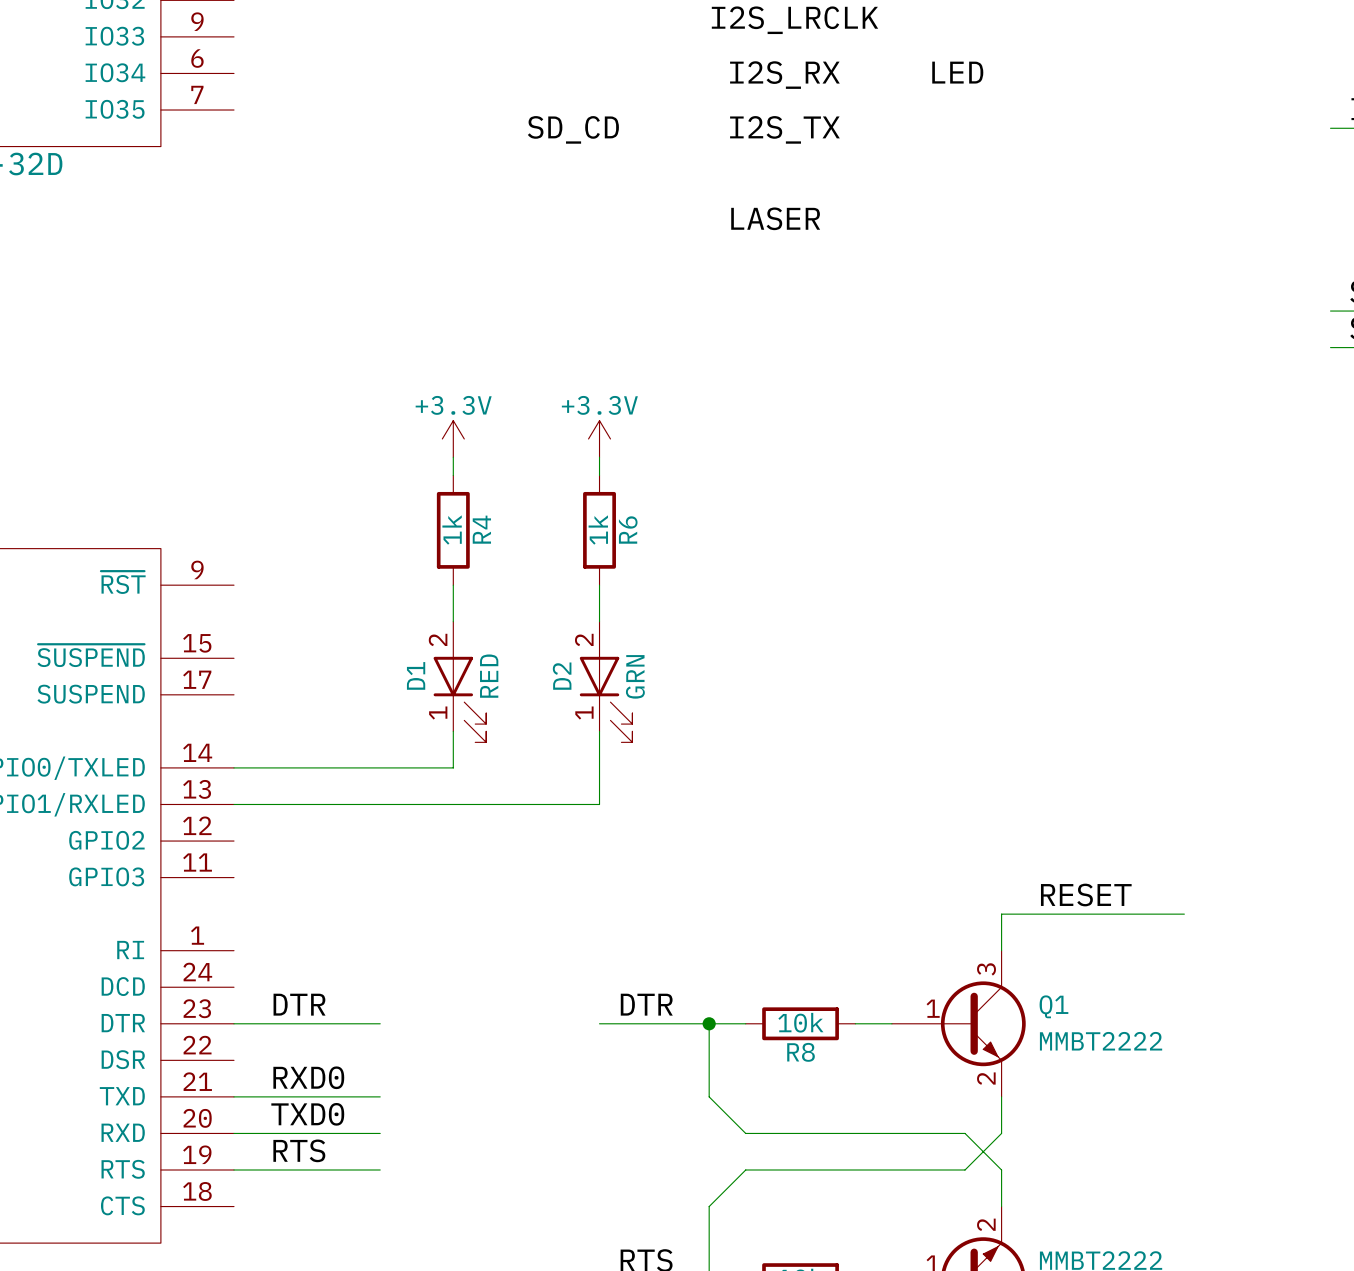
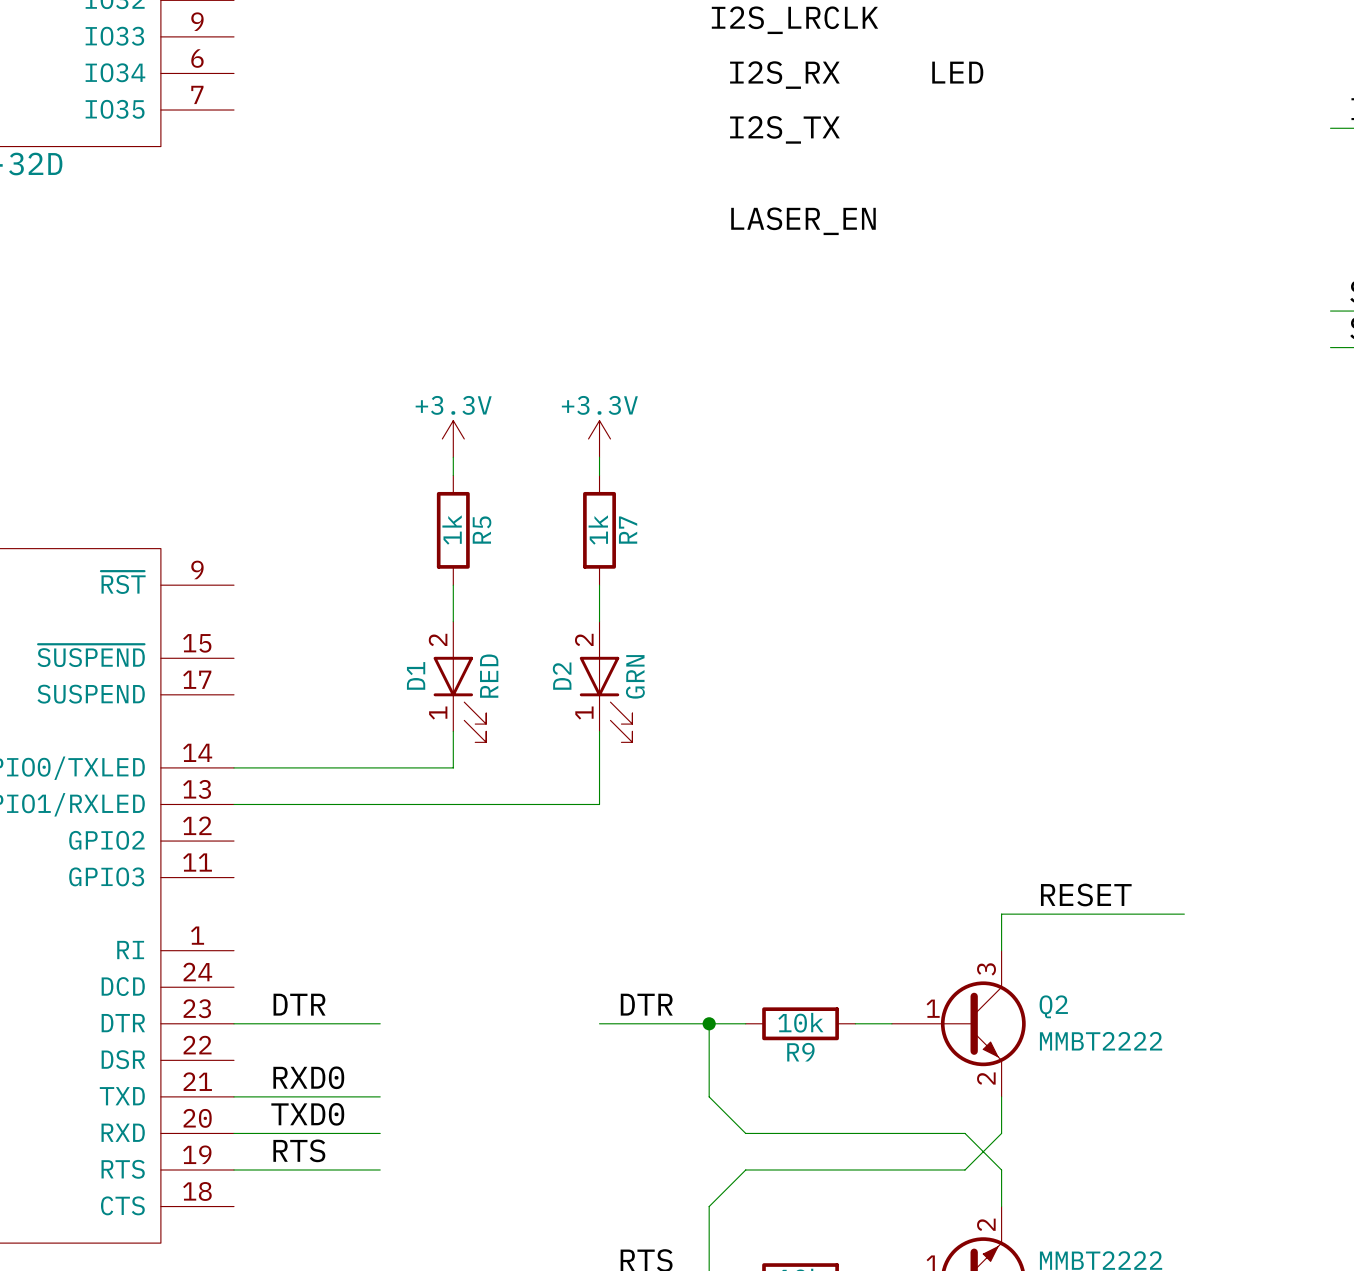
label: SD_CD (573, 129) -> none
label: LASER (775, 218) -> LASER_EN (803, 221)
R4 name: R4 (481, 529) -> R5 (482, 530)
R6 name: R6 (628, 530) -> R7 (628, 530)
Q1 name: Q1 (1053, 1006) -> Q2 (1053, 1006)
R8 name: R8 (801, 1052) -> R9 (800, 1052)

